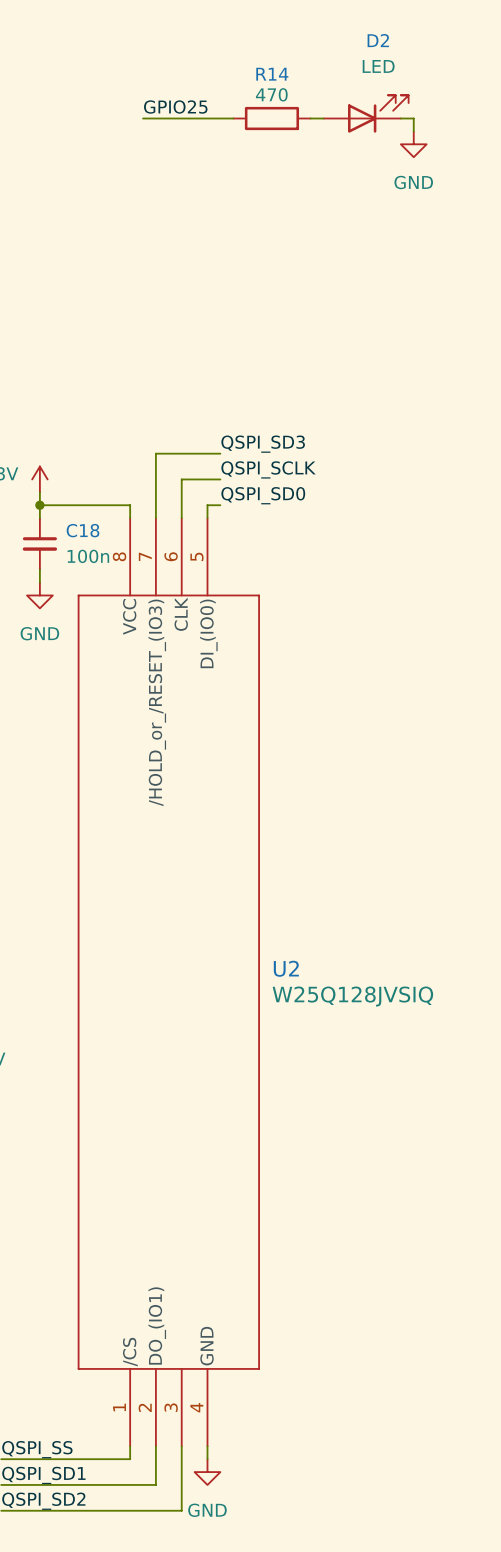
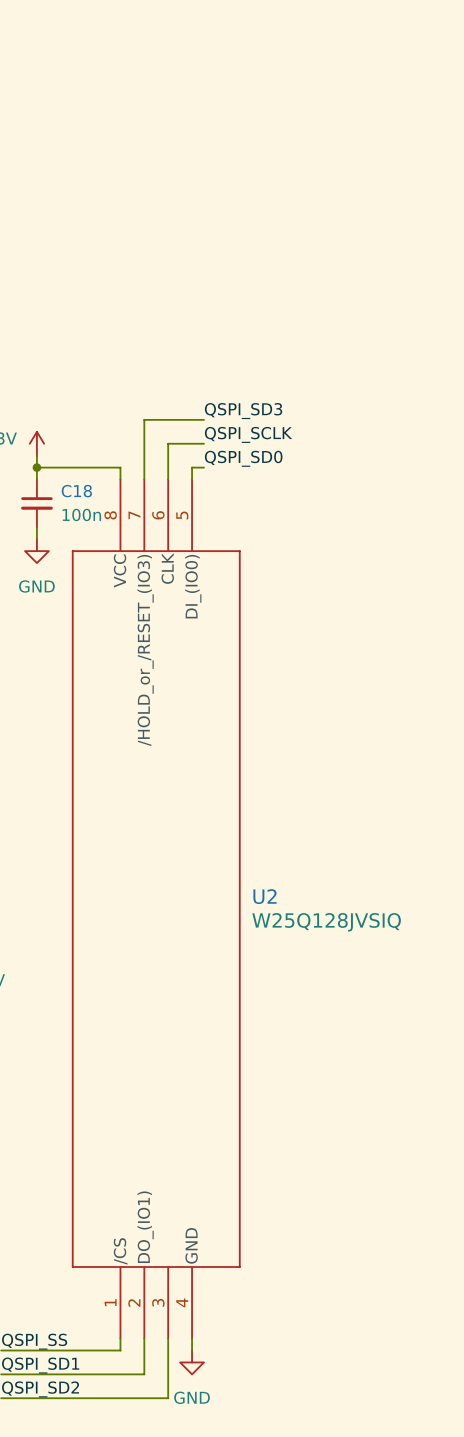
label: GPIO25 (175, 107) -> none
D2: LED (366, 113) -> none
wire: (143, 118) (233, 118) -> none
R14: 470 (271, 118) -> none
wire: (310, 118) (323, 118) -> none
wire: (400, 118) (413, 118) (413, 131) -> none
power symbol: GND (413, 144) -> none

